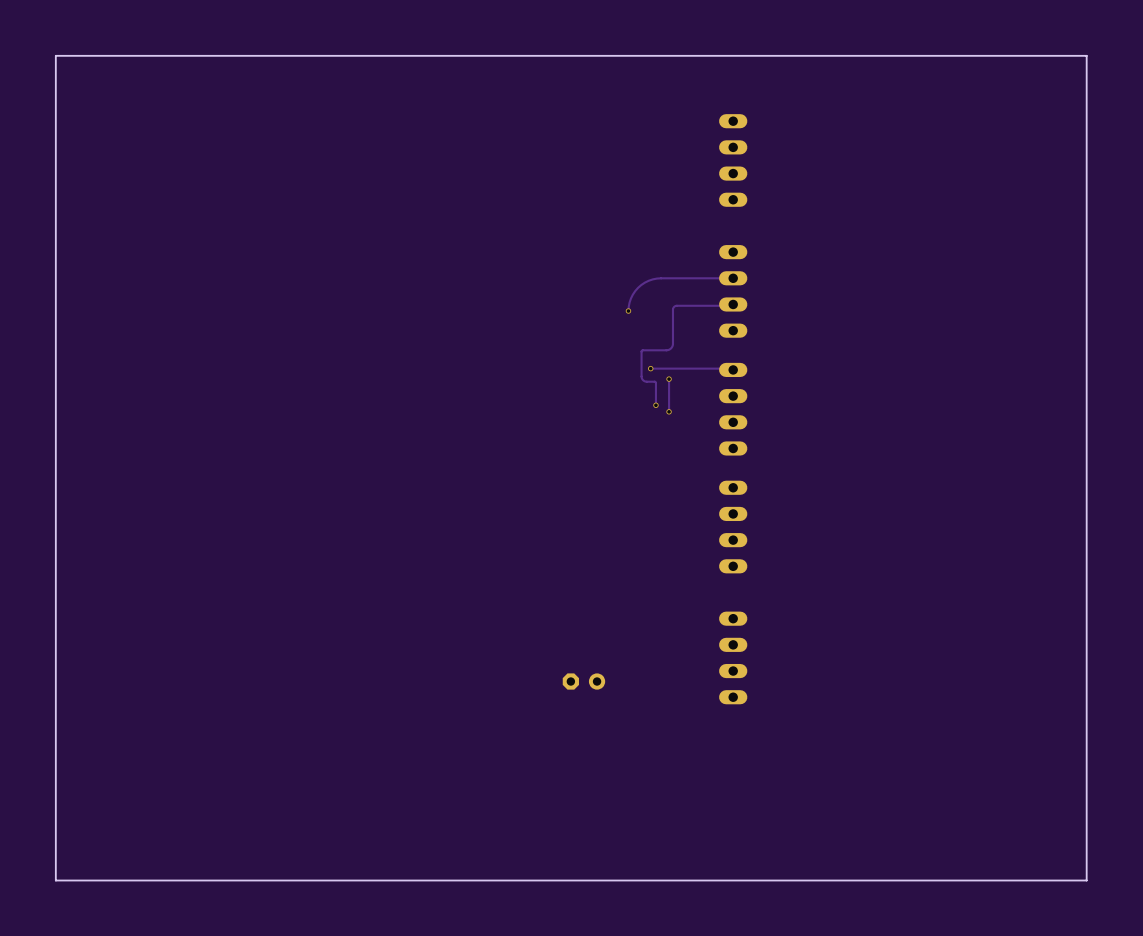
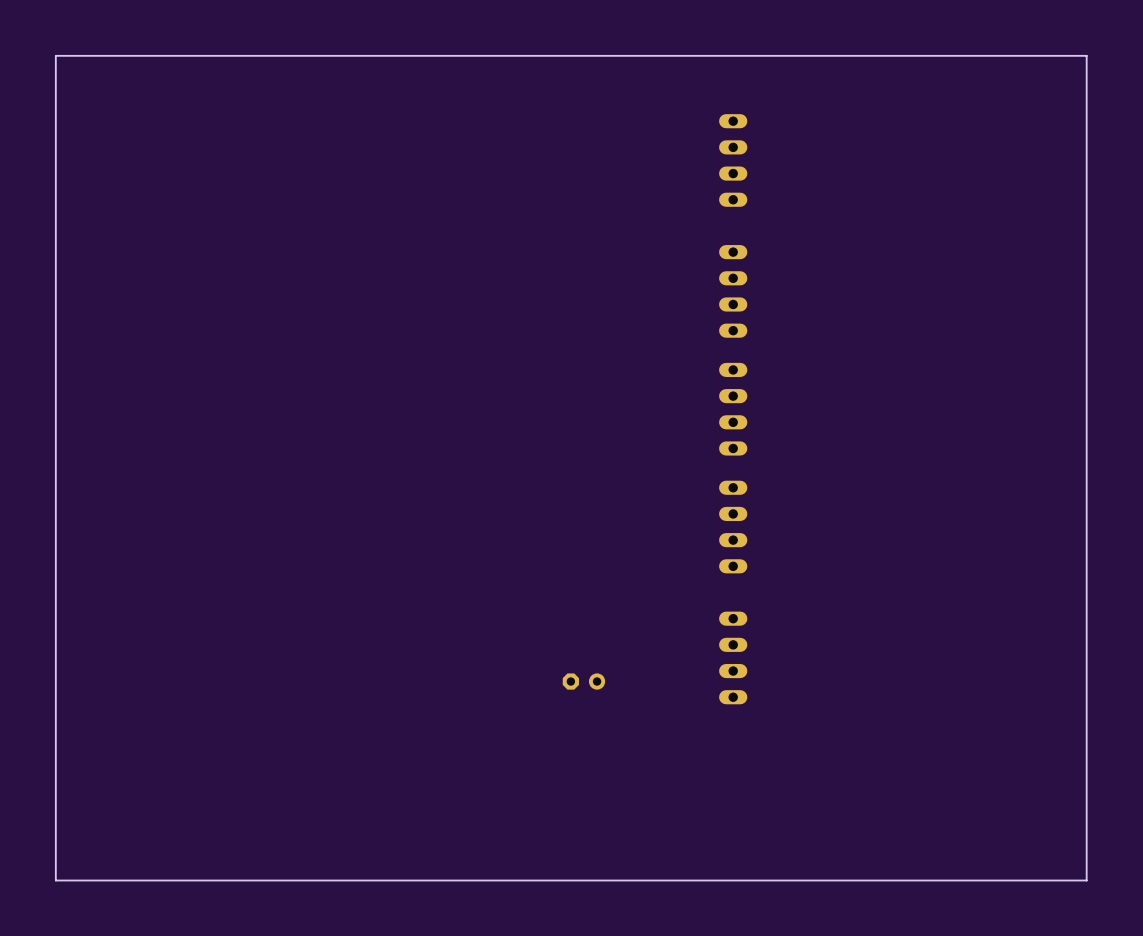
track: (733, 278) (652, 279) (641, 285) (635, 291) (630, 298) (628, 311) -> none
track: (733, 304) (673, 307) (671, 347) (667, 350) (641, 351) (641, 377) (645, 381) (655, 382) (655, 405) -> none
via: (628, 311) -> none
track: (650, 368) (733, 369) -> none
via: (650, 368) -> none
track: (669, 379) (669, 411) -> none
via: (669, 379) -> none
via: (655, 405) -> none
via: (669, 411) -> none

